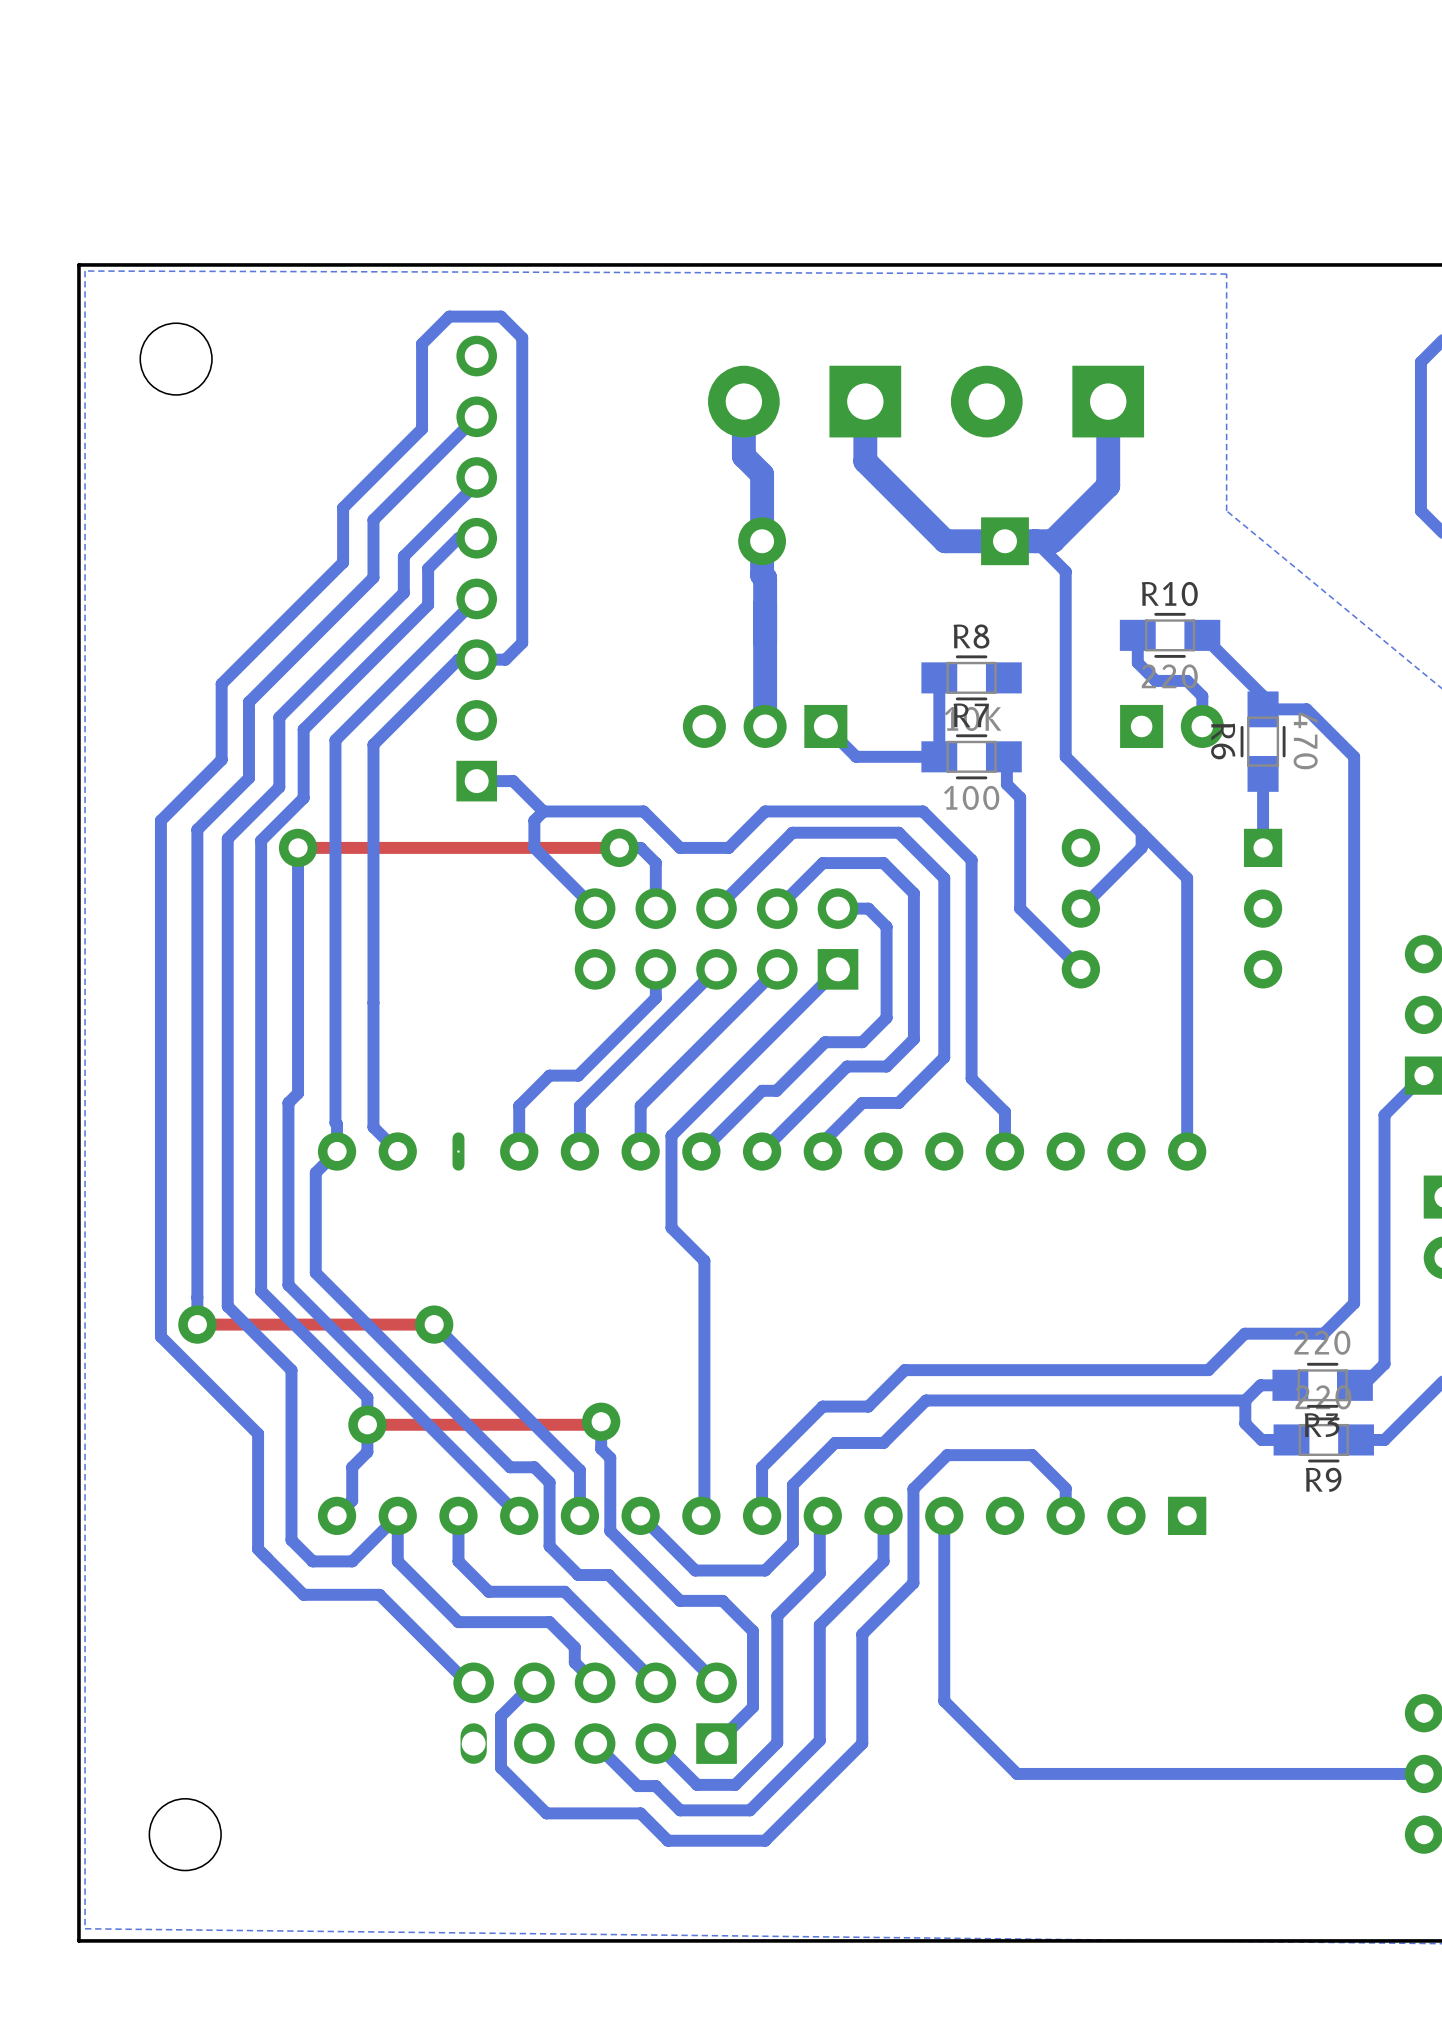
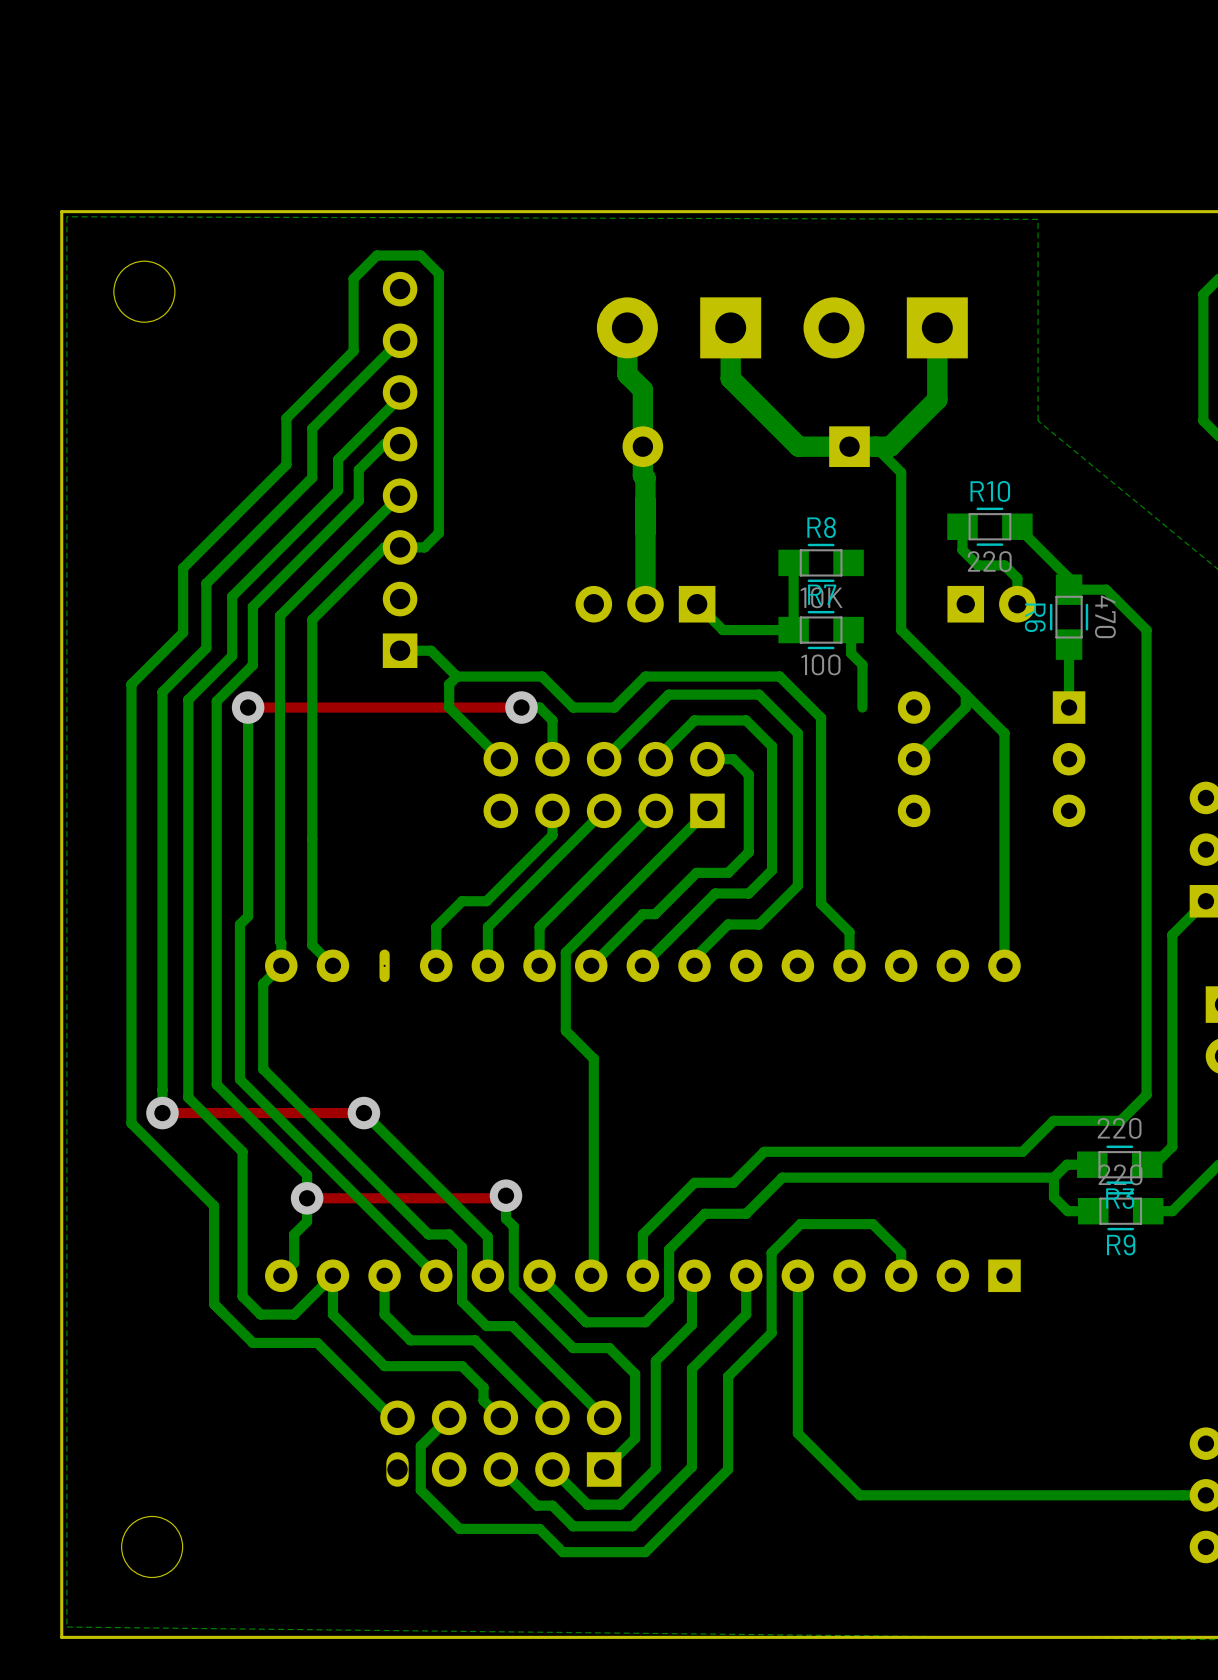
bottom track: (1020, 847) (1020, 908) (1080, 969) -> none

